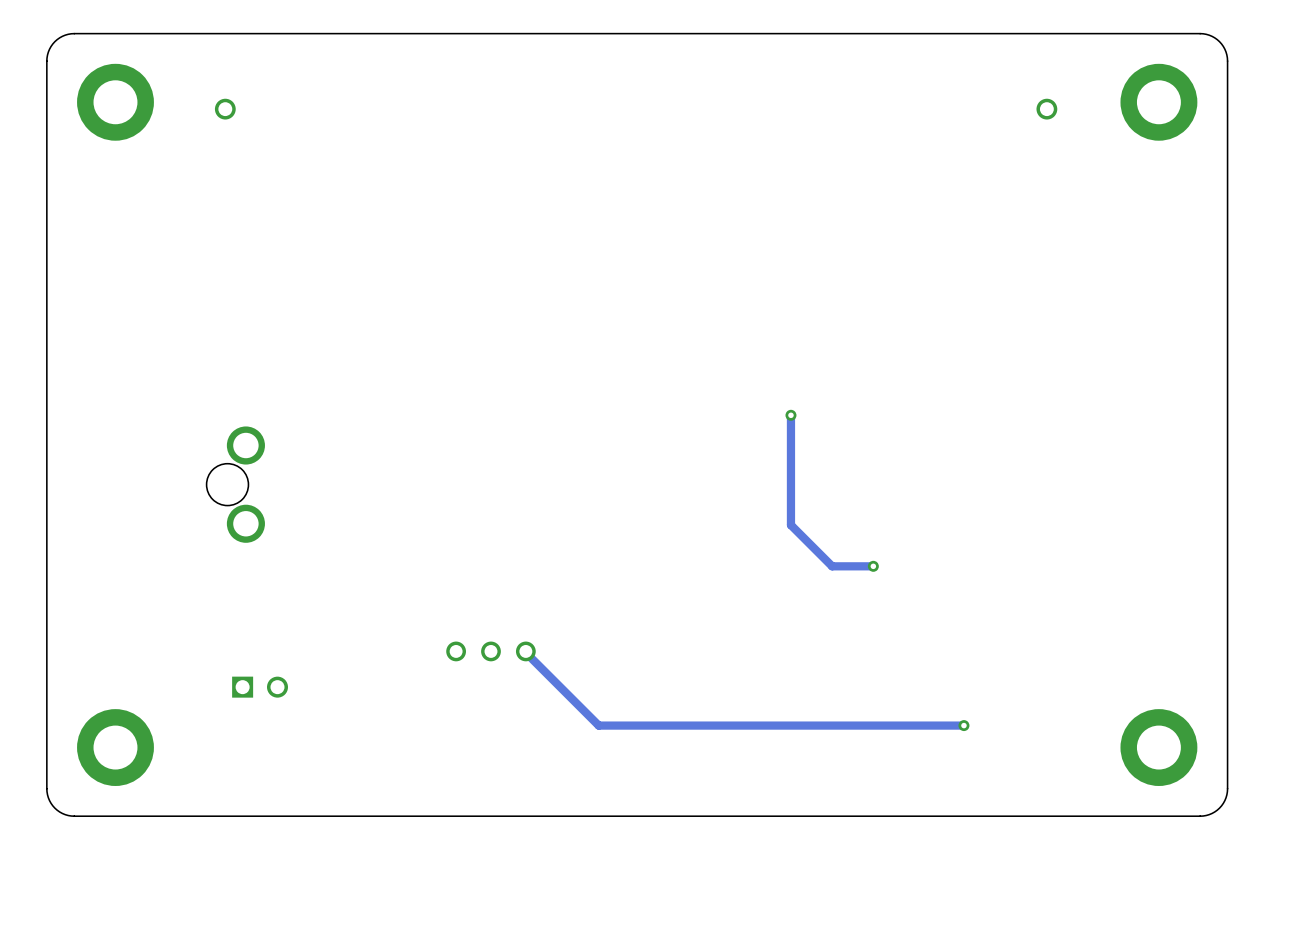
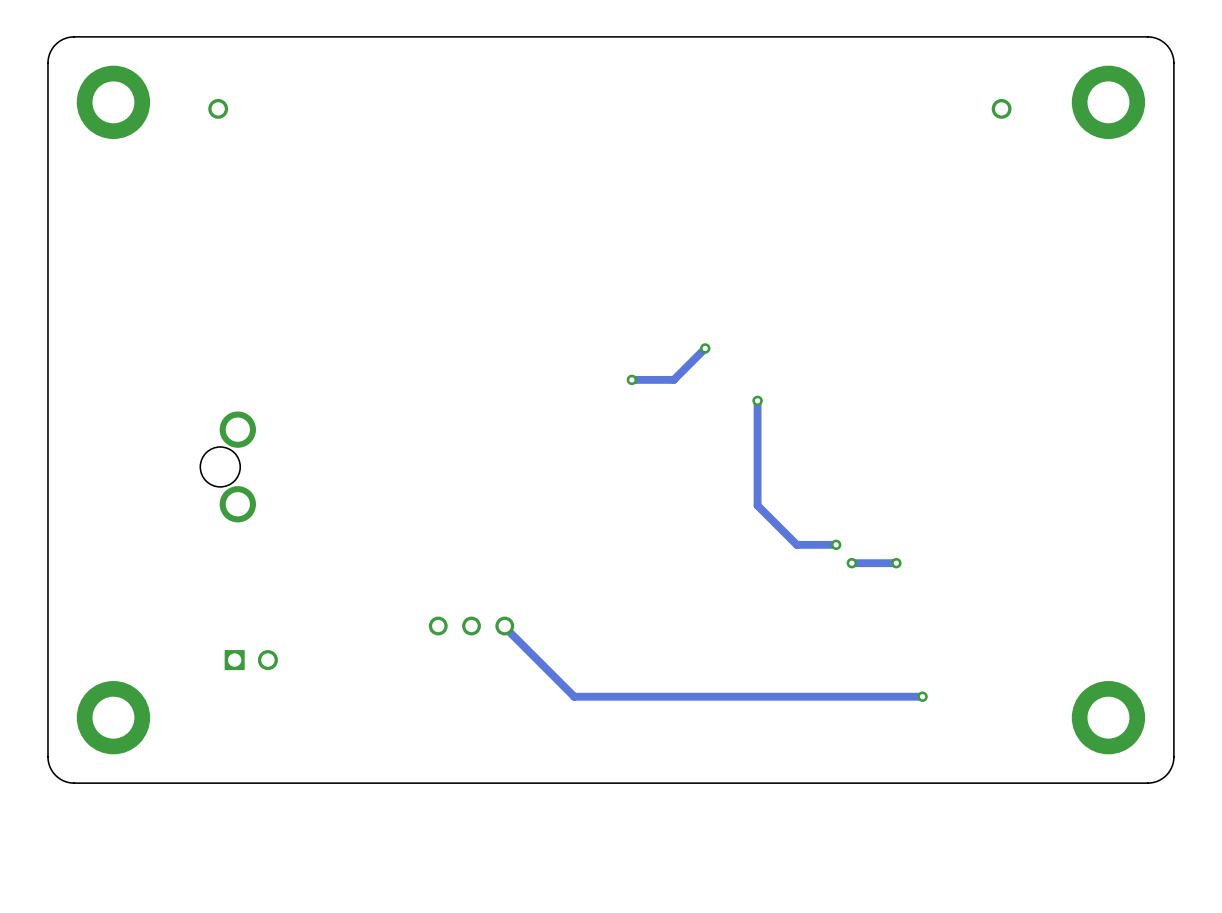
track: none -> (705, 348) (673, 379) (631, 379)
via: none -> (705, 348)
via: none -> (631, 379)
via: none -> (851, 563)
track: none -> (896, 563) (851, 563)
via: none -> (896, 563)

